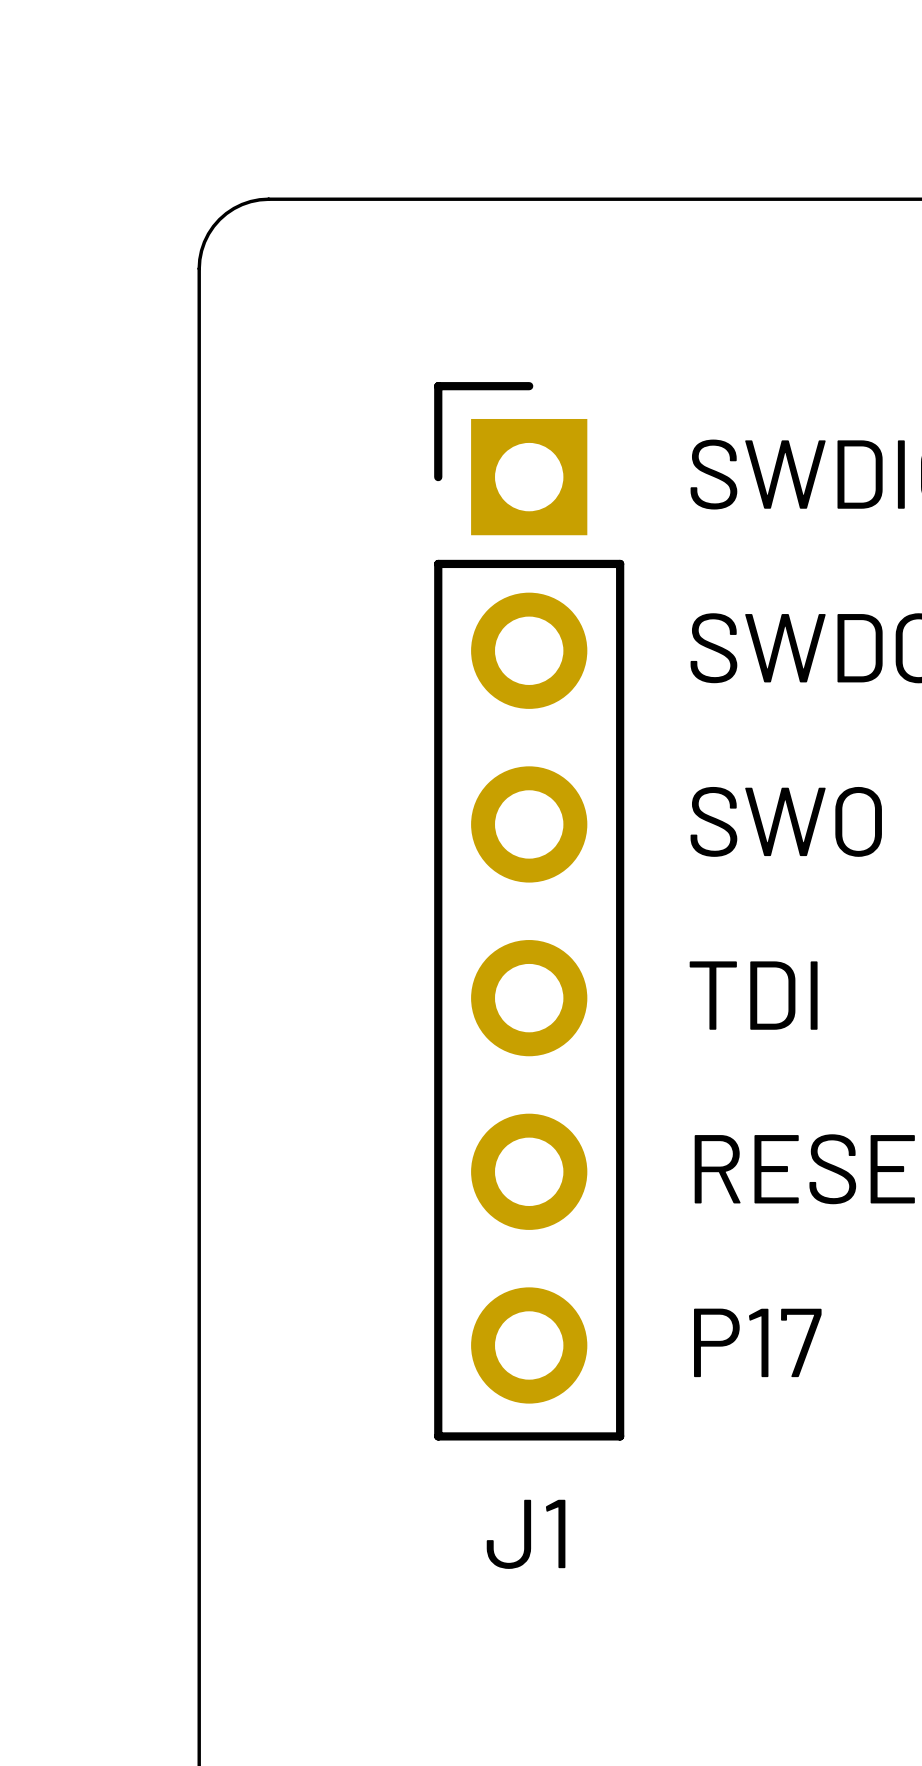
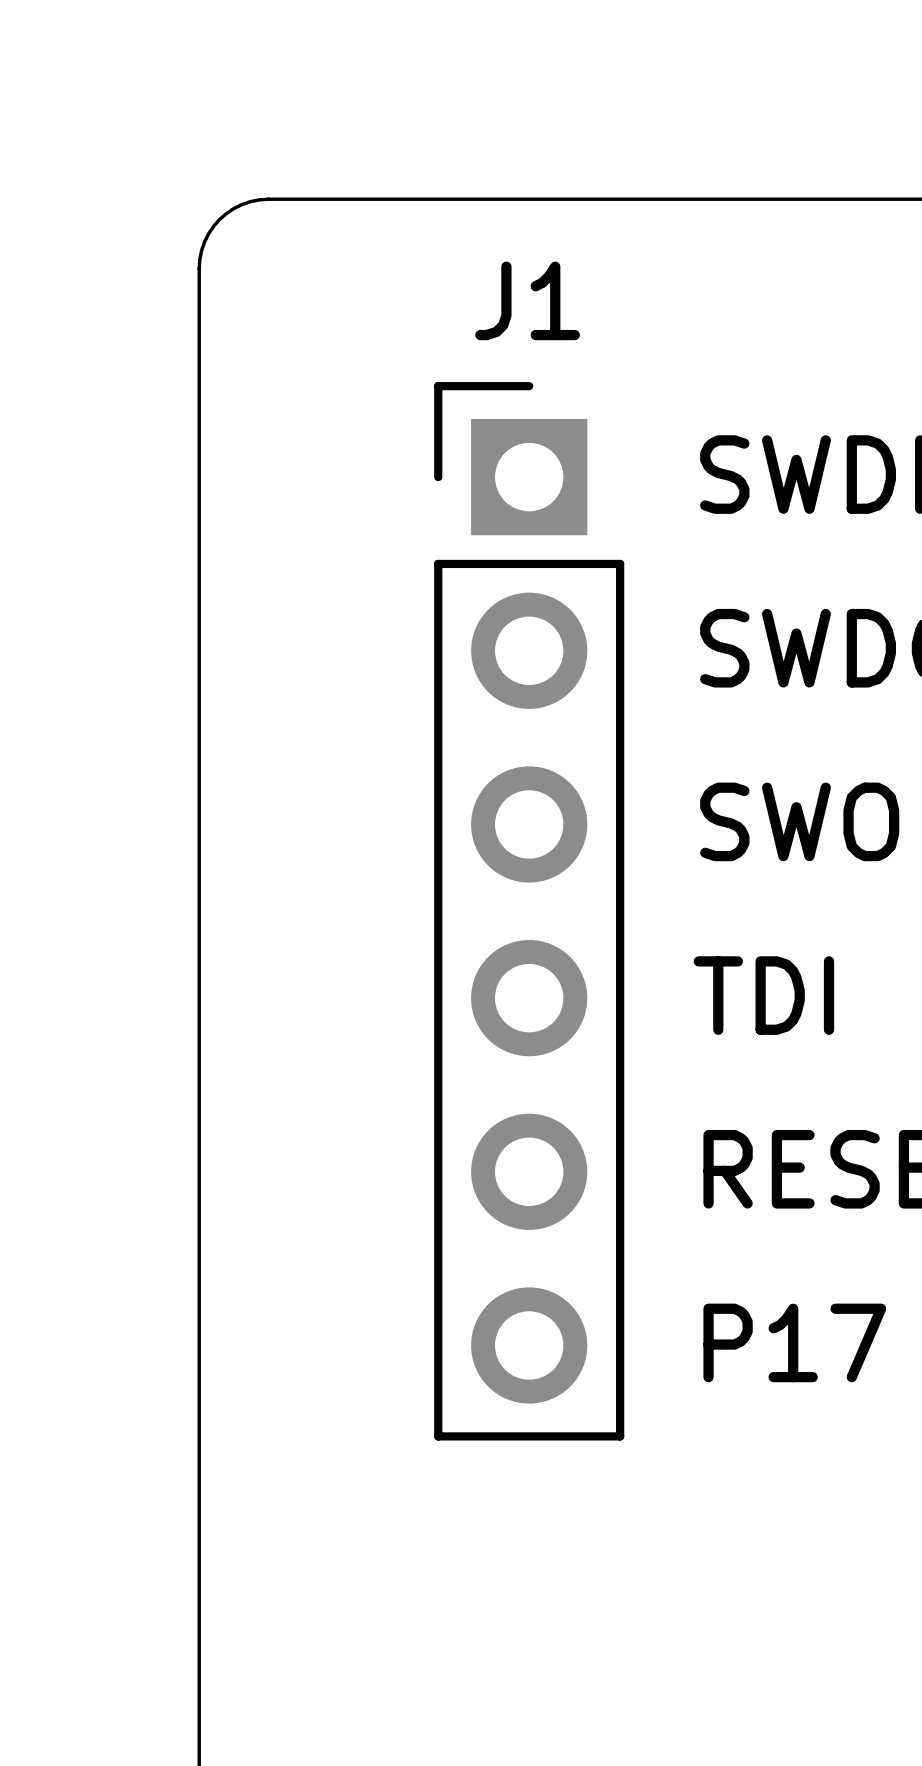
J1 name position: J1 (526, 1534) -> J1 (527, 300)

